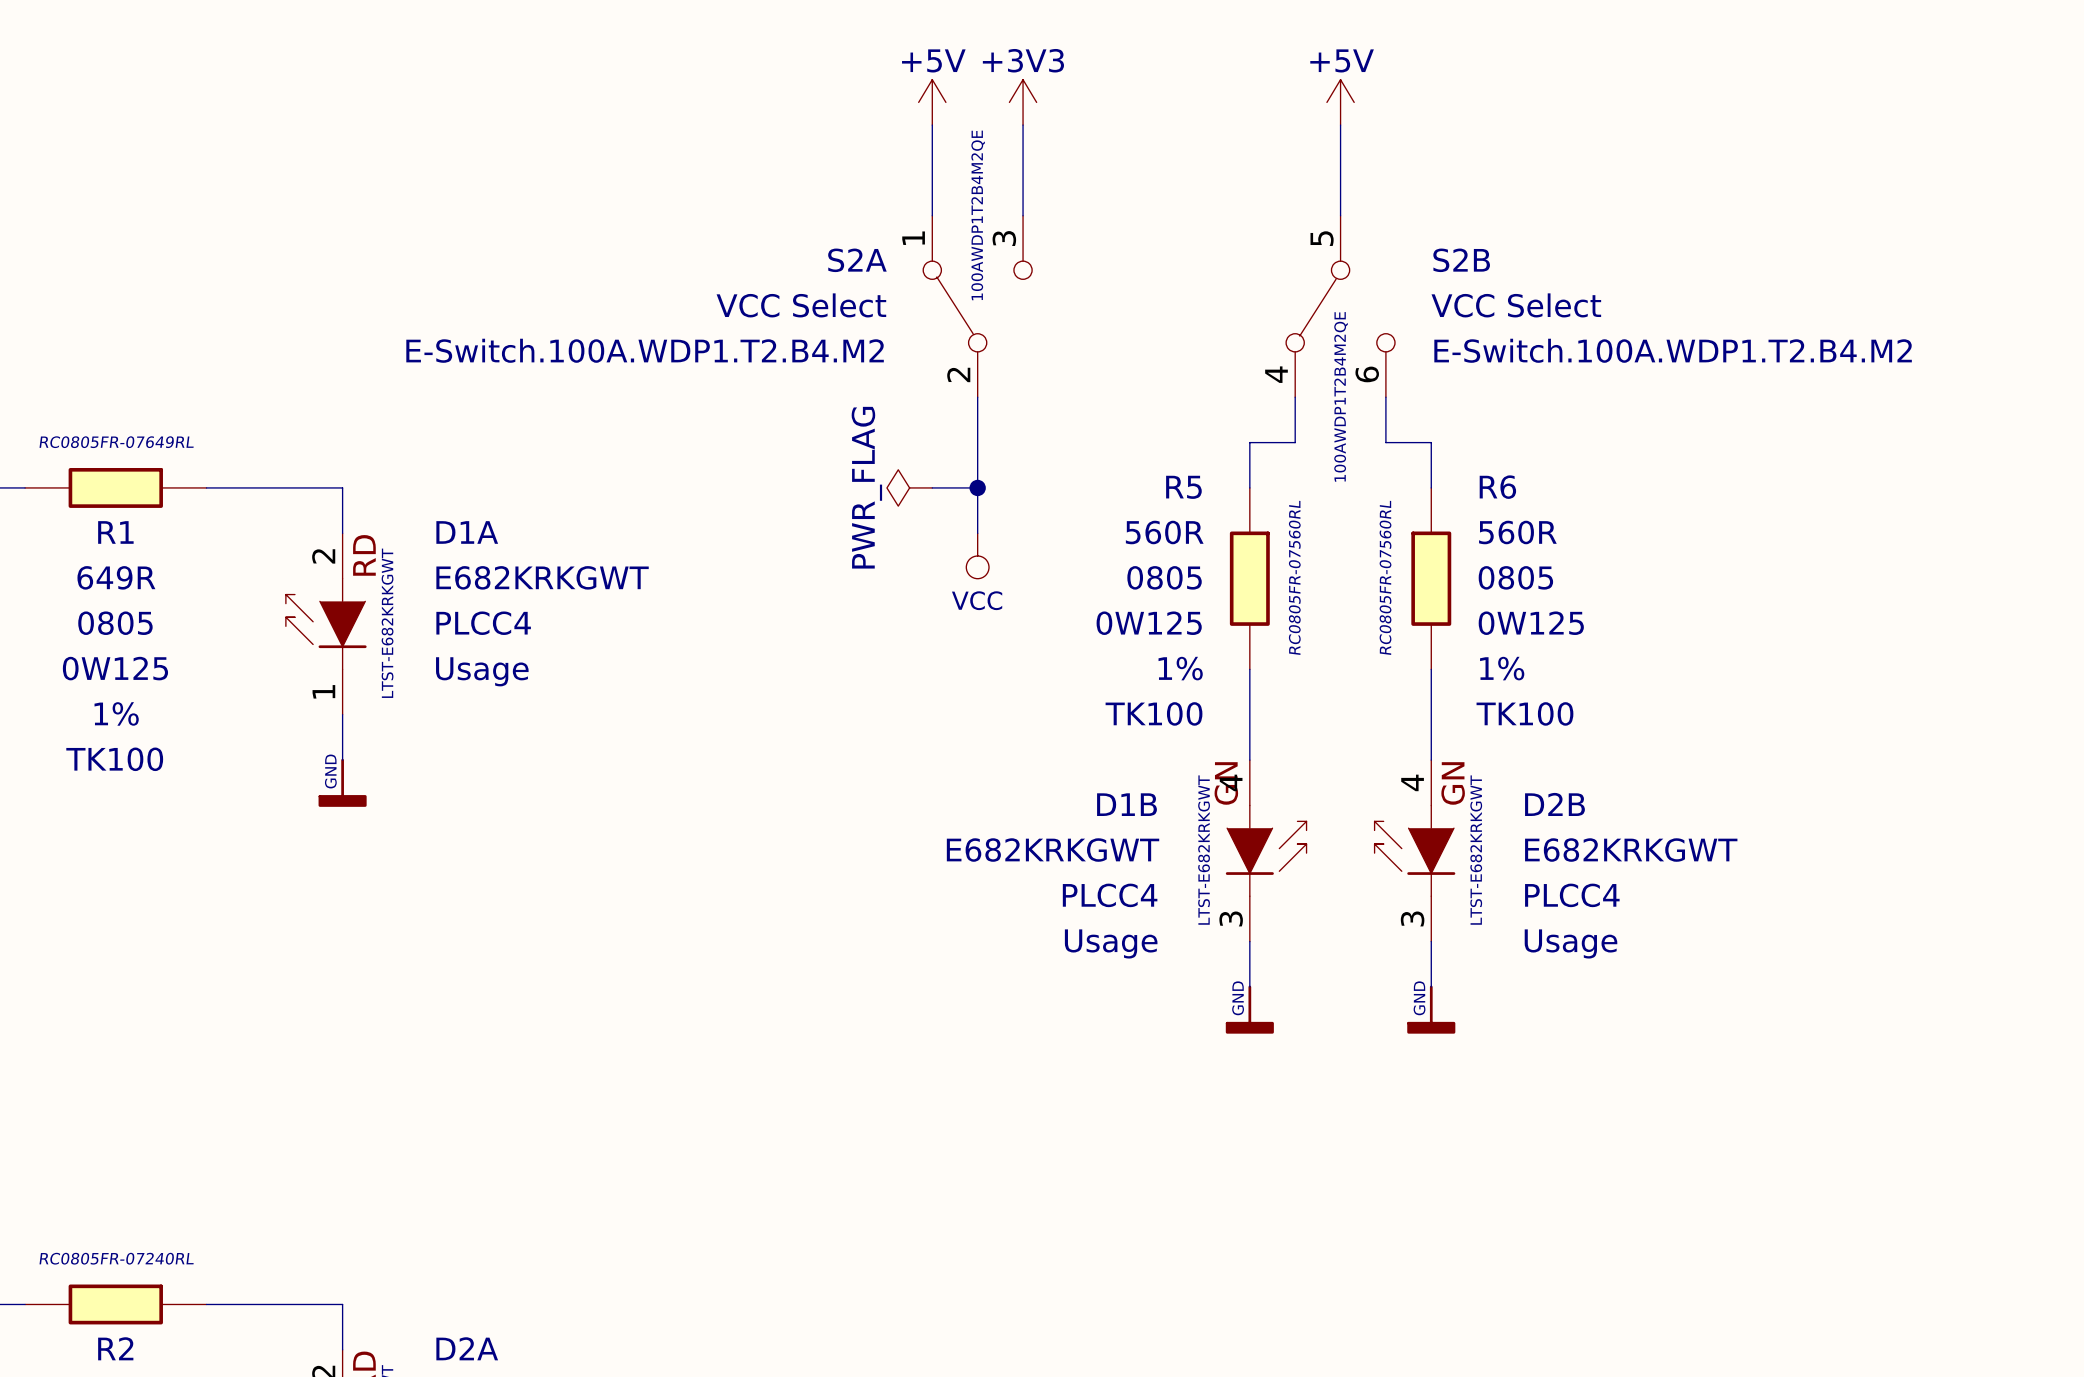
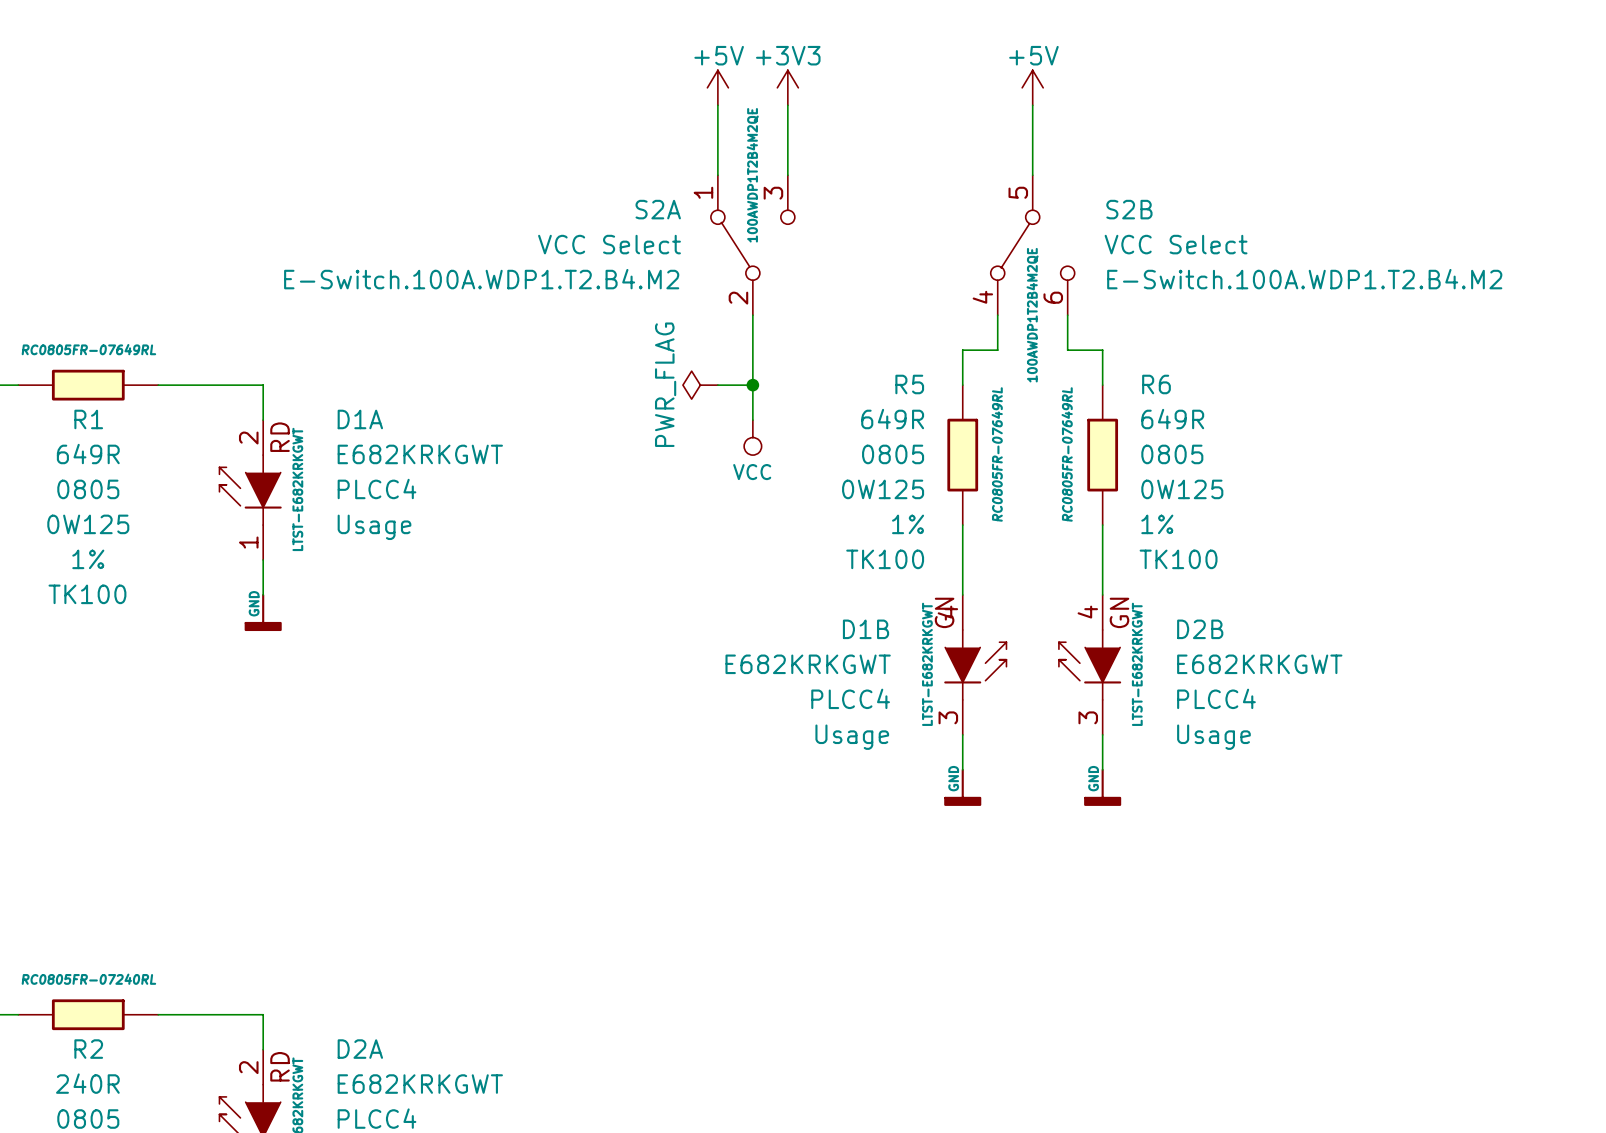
R5 value: 560R (1164, 532) -> 649R (892, 419)
R6 value: 560R (1517, 532) -> 649R (1172, 419)
R5 text: RC0805FR-07560RL (1294, 577) -> RC0805FR-07649RL (997, 454)
R6 text: RC0805FR-07560RL (1385, 577) -> RC0805FR-07649RL (1067, 454)

